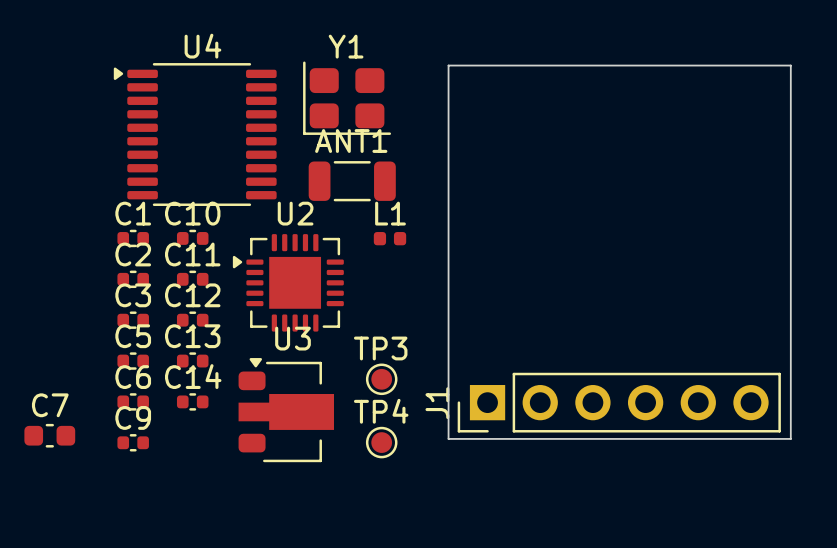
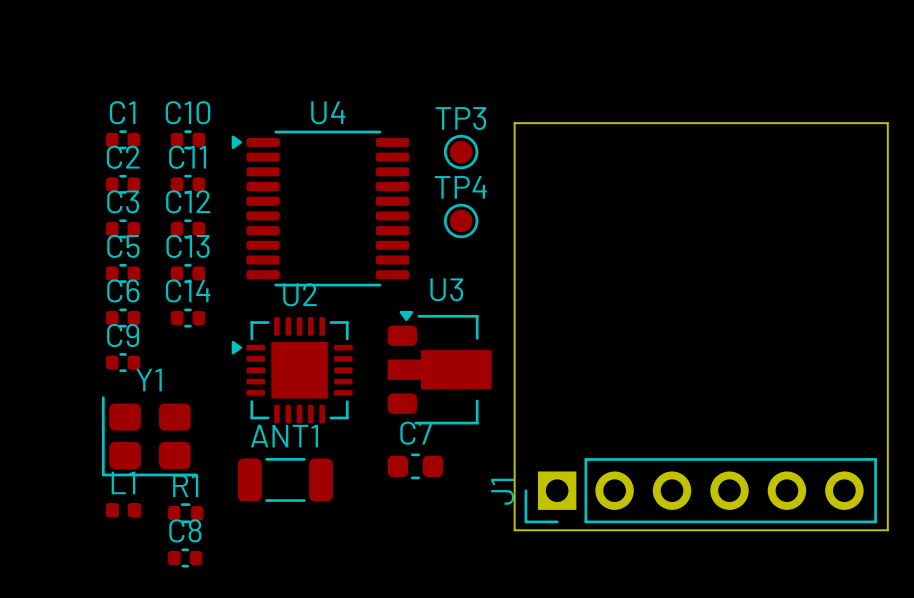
Y1 position: (347, 98) -> (149, 436)
U4 position: (195, 134) -> (320, 208)
ANT1 position: (352, 181) -> (285, 479)
C1 position: (133, 238) -> (123, 139)
C10 position: (192, 238) -> (187, 139)
L1 position: (390, 238) -> (123, 510)
C2 position: (133, 279) -> (123, 184)
C11 position: (192, 279) -> (187, 184)
U2 position: (288, 282) -> (292, 370)
C3 position: (133, 320) -> (123, 228)
C12 position: (192, 320) -> (187, 228)
C5 position: (133, 361) -> (123, 273)
C13 position: (192, 361) -> (187, 273)
TP3 position: (381, 379) -> (461, 152)
C6 position: (133, 401) -> (123, 318)
C14 position: (192, 401) -> (187, 318)
U3 position: (286, 410) -> (439, 367)
R1: none -> (185, 513)
C7 position: (49, 435) -> (415, 466)
C9 position: (133, 442) -> (123, 362)
TP4 position: (381, 442) -> (461, 220)
C8: none -> (185, 557)

